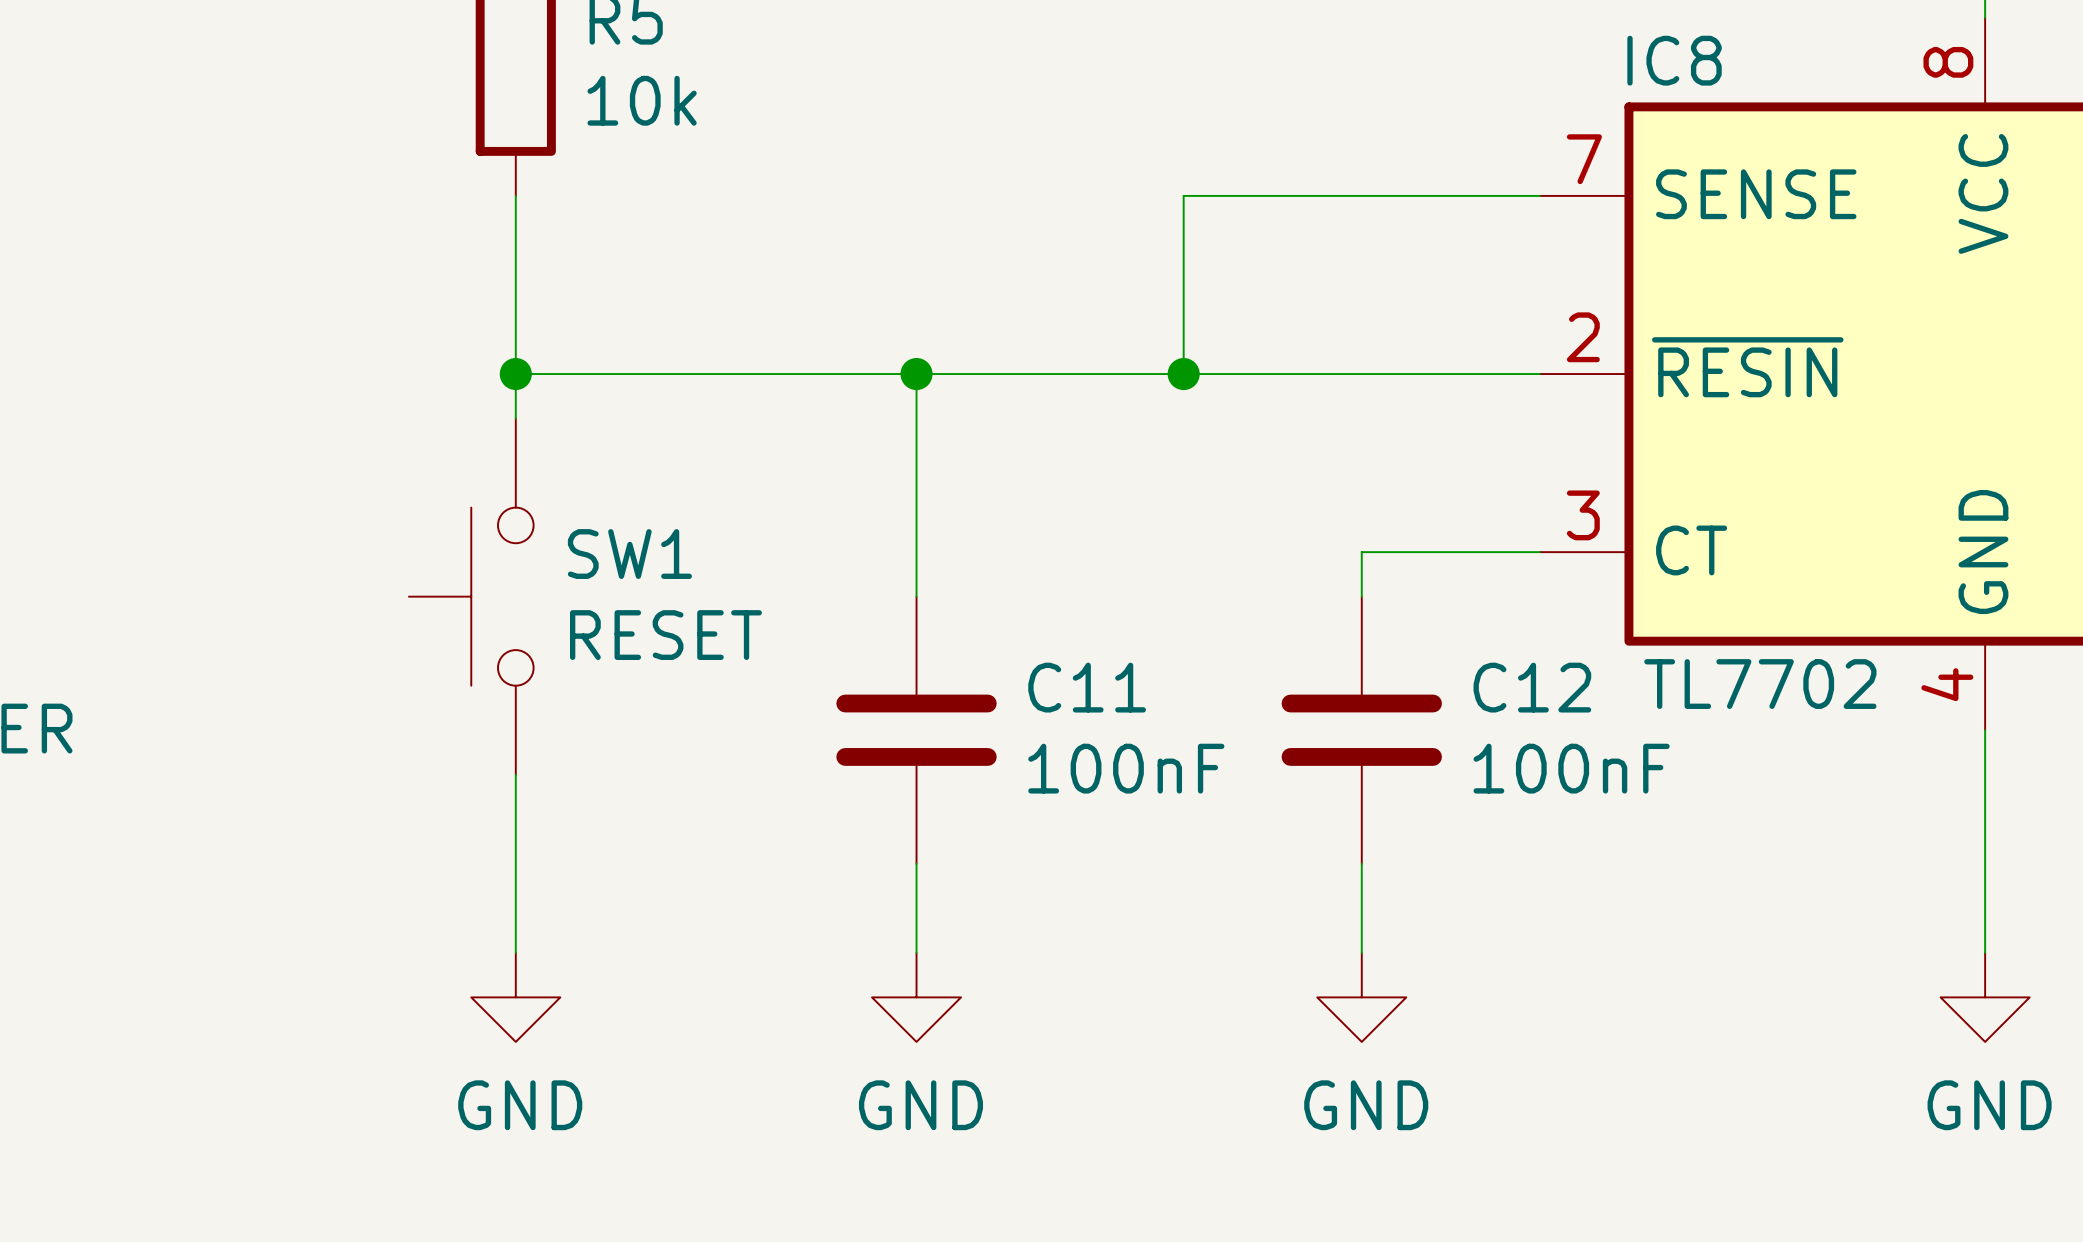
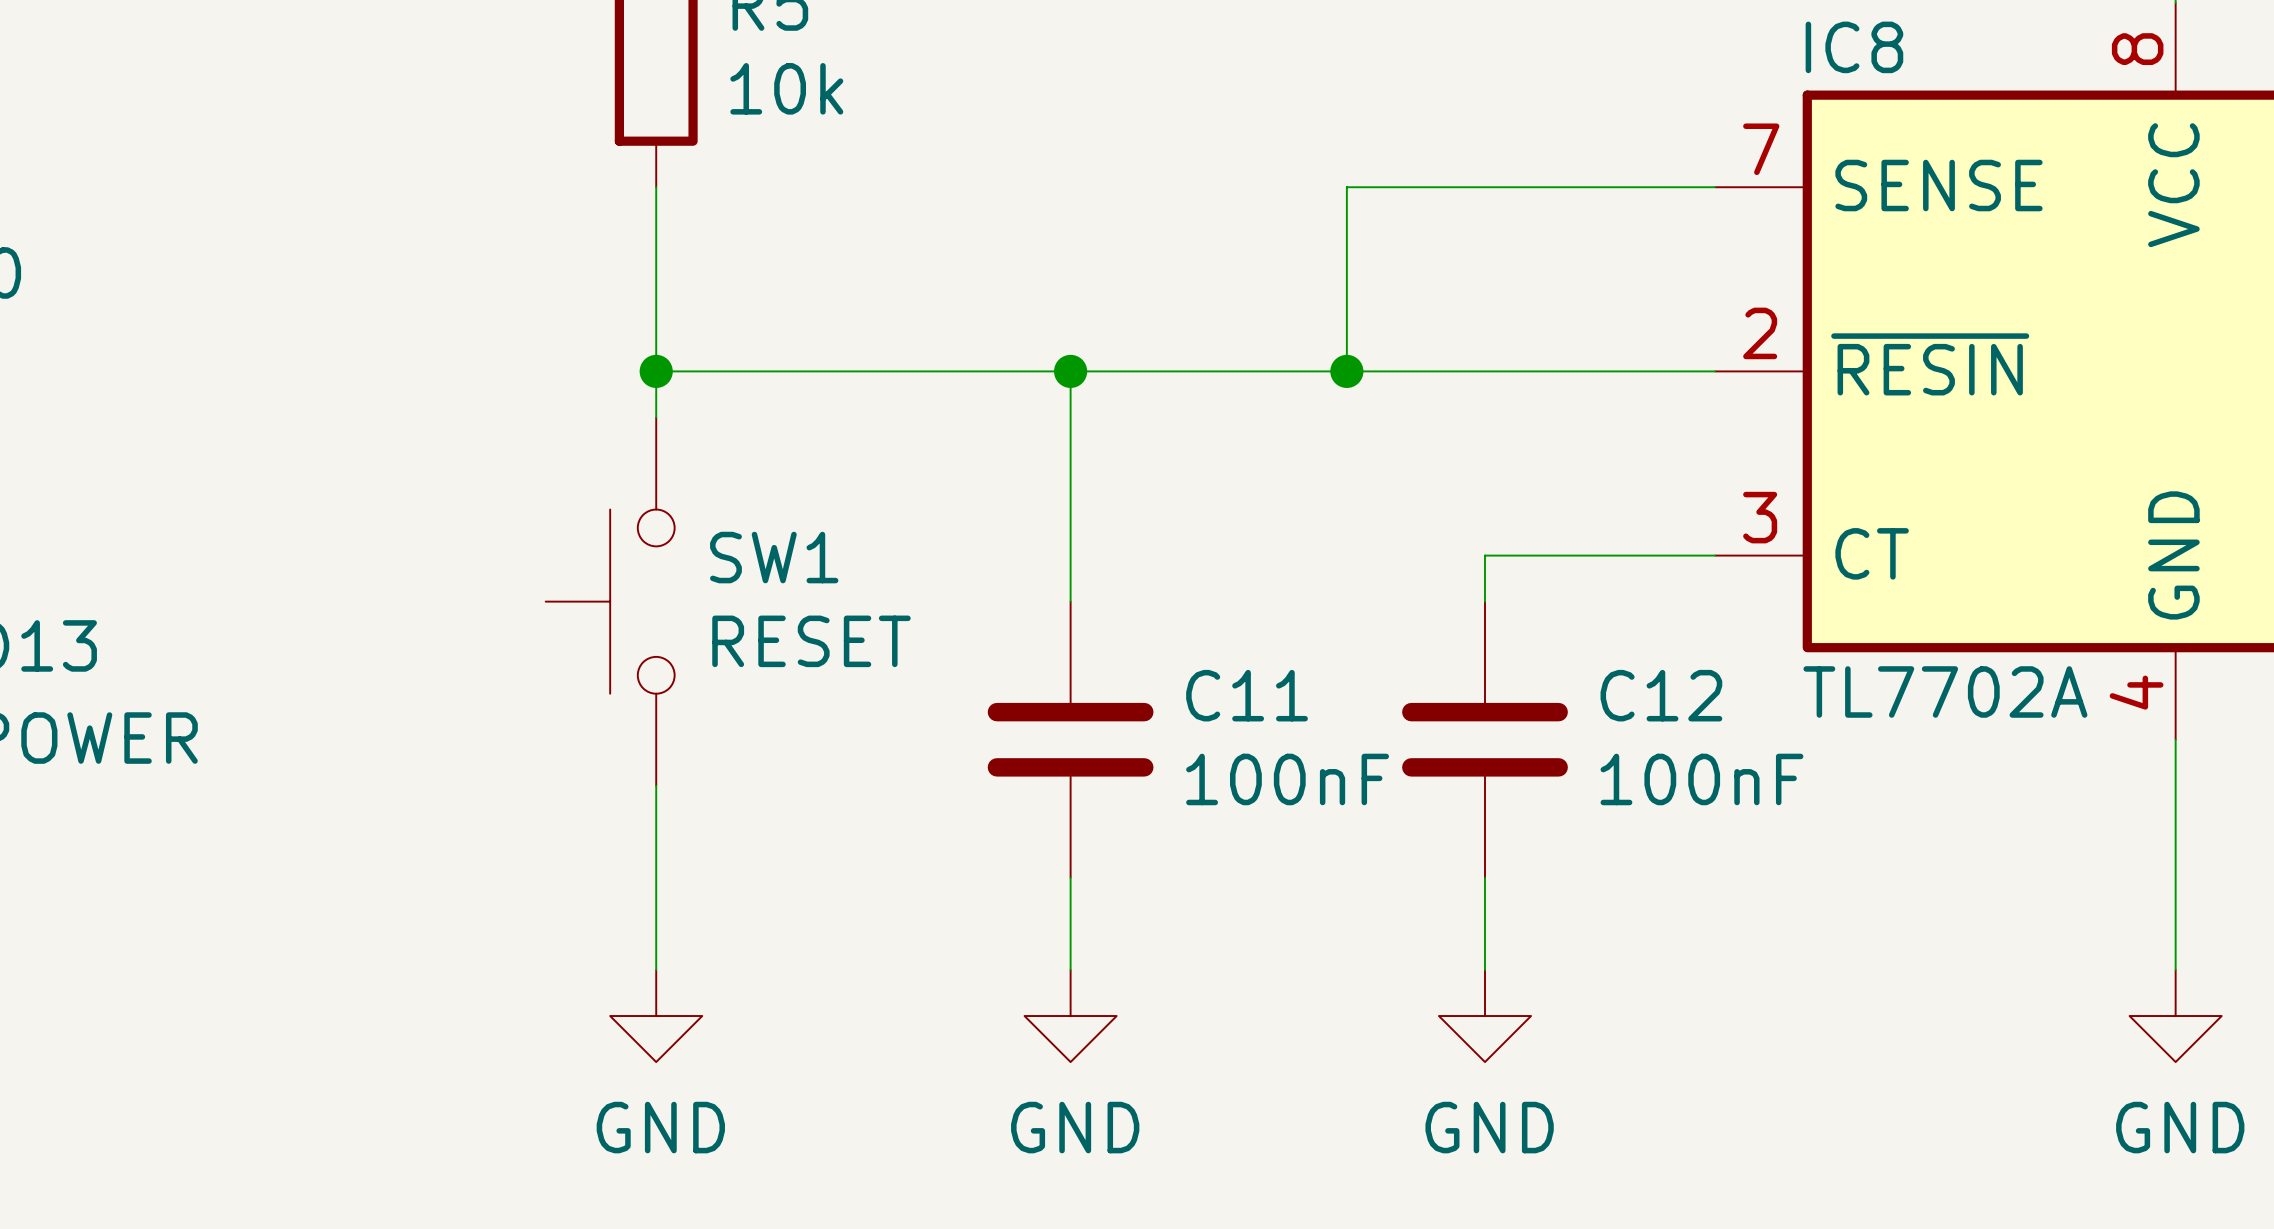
wire: (1361, 552) (1361, 596) -> (1531, 555) (1485, 555) (1485, 601)
IC8 value: TL7702 (1760, 684) -> TL7702A (1945, 691)
C12 position: (1361, 730) -> (1485, 739)
wire: (1361, 863) (1361, 952) -> (1485, 877) (1485, 969)
power symbol position: GND (1361, 997) -> GND (1485, 1016)

